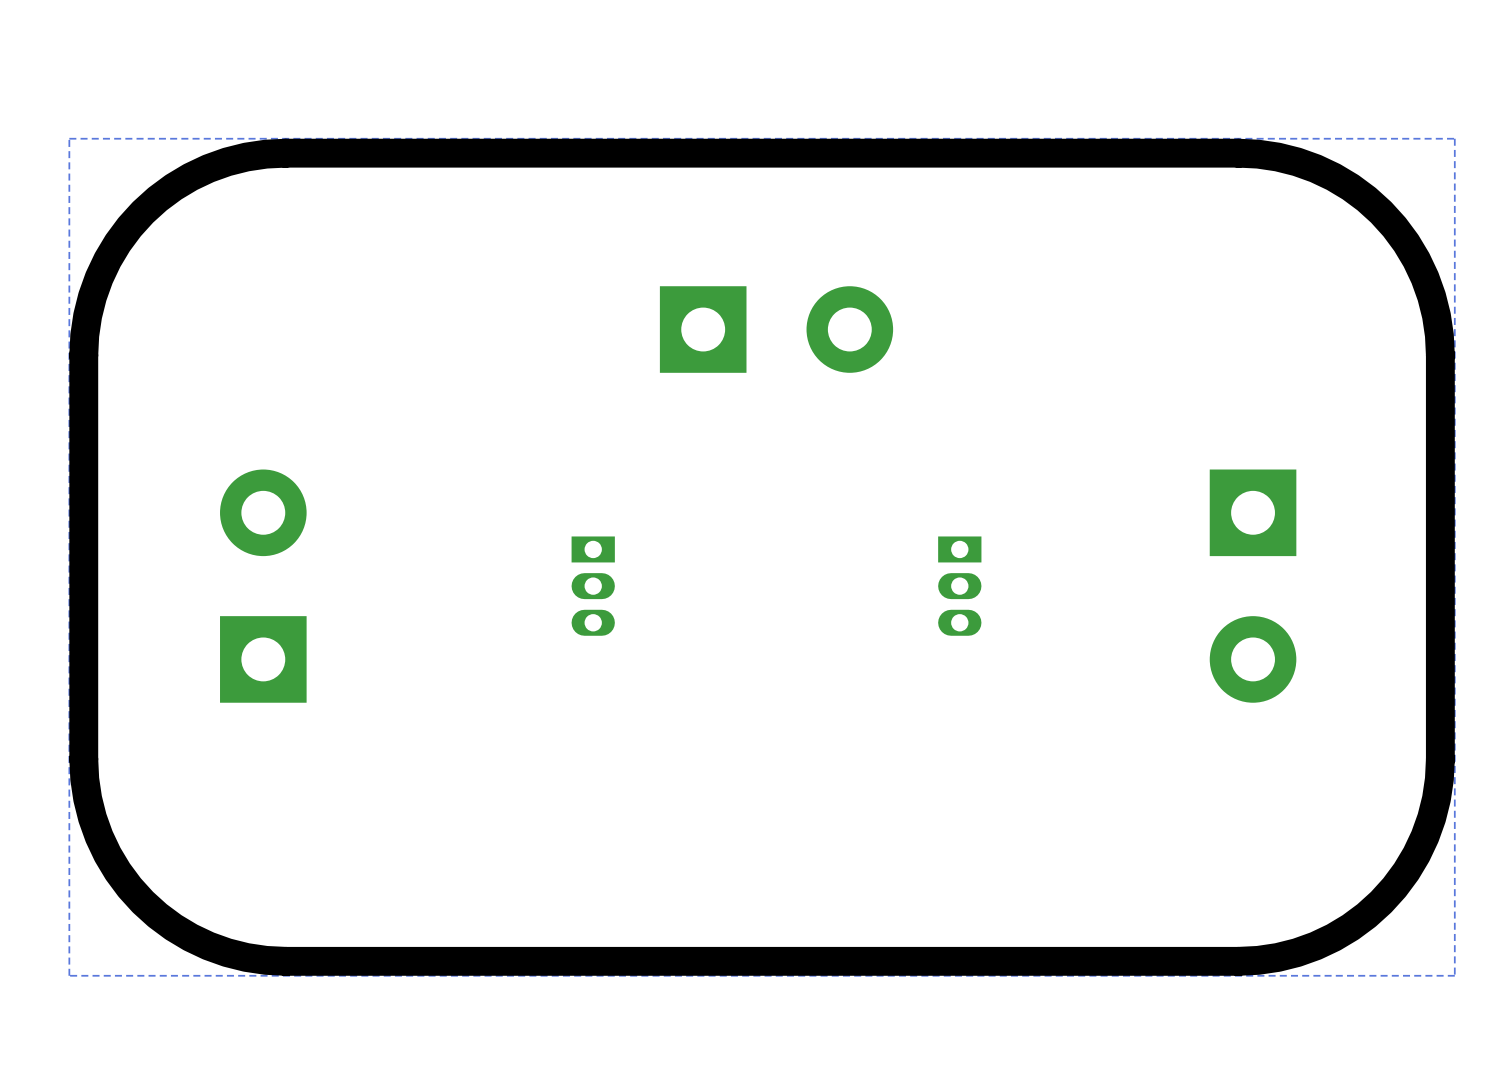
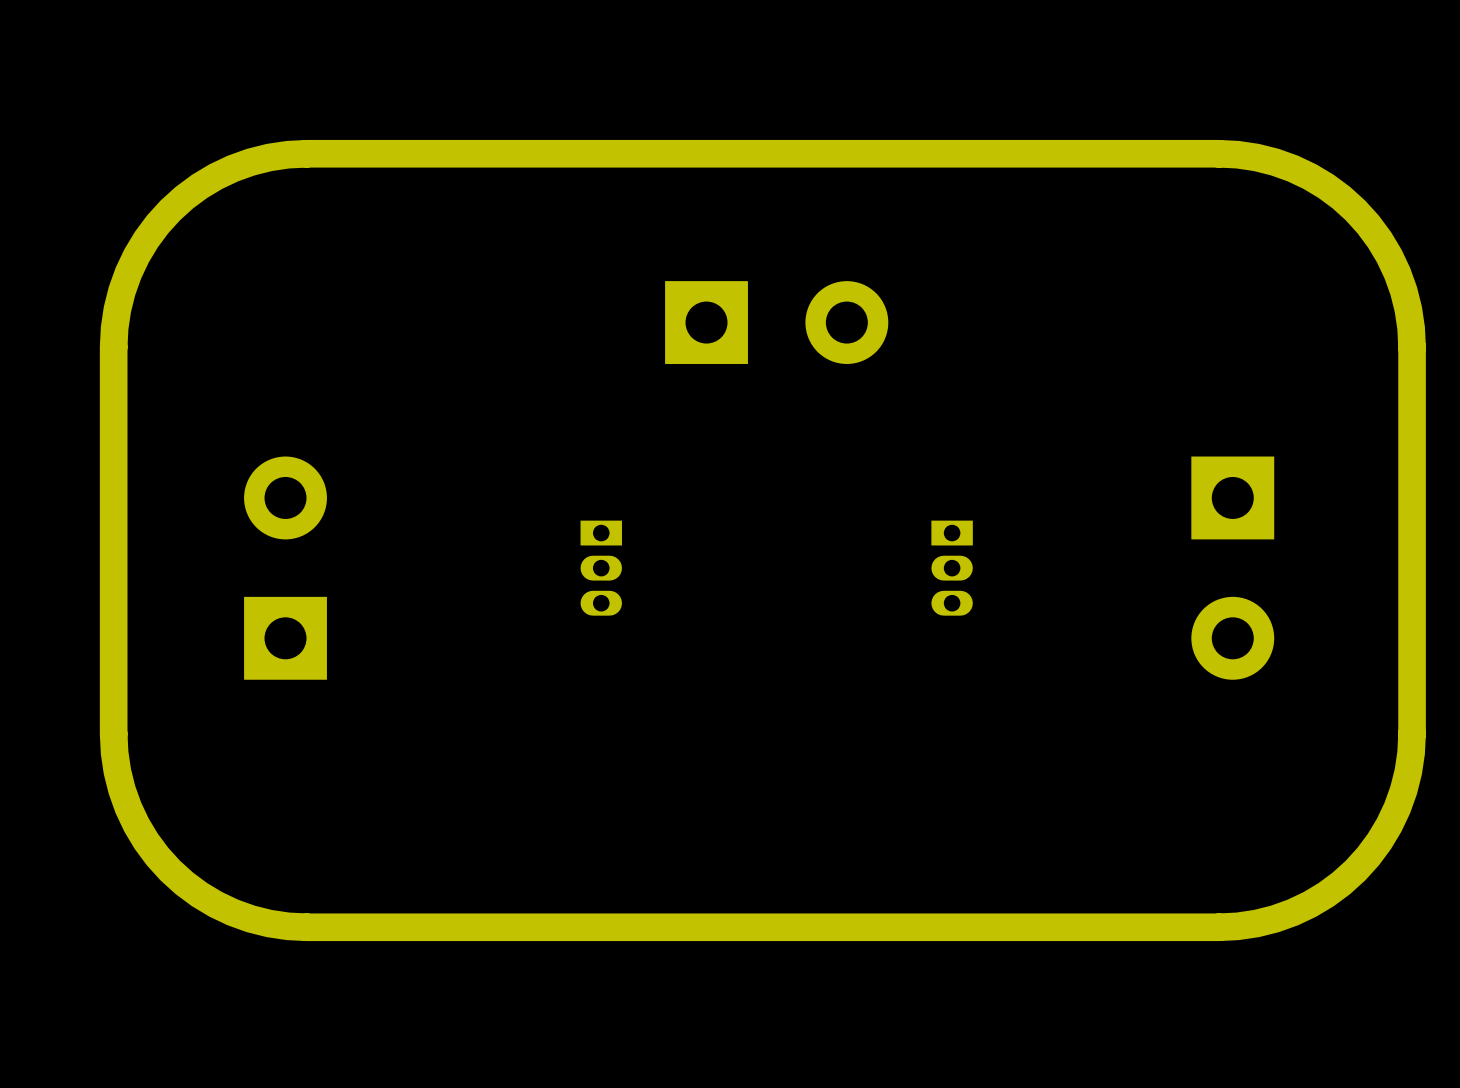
zone outline: (1454, 138) (1454, 975) (69, 975) (69, 138) (1454, 138) -> none

